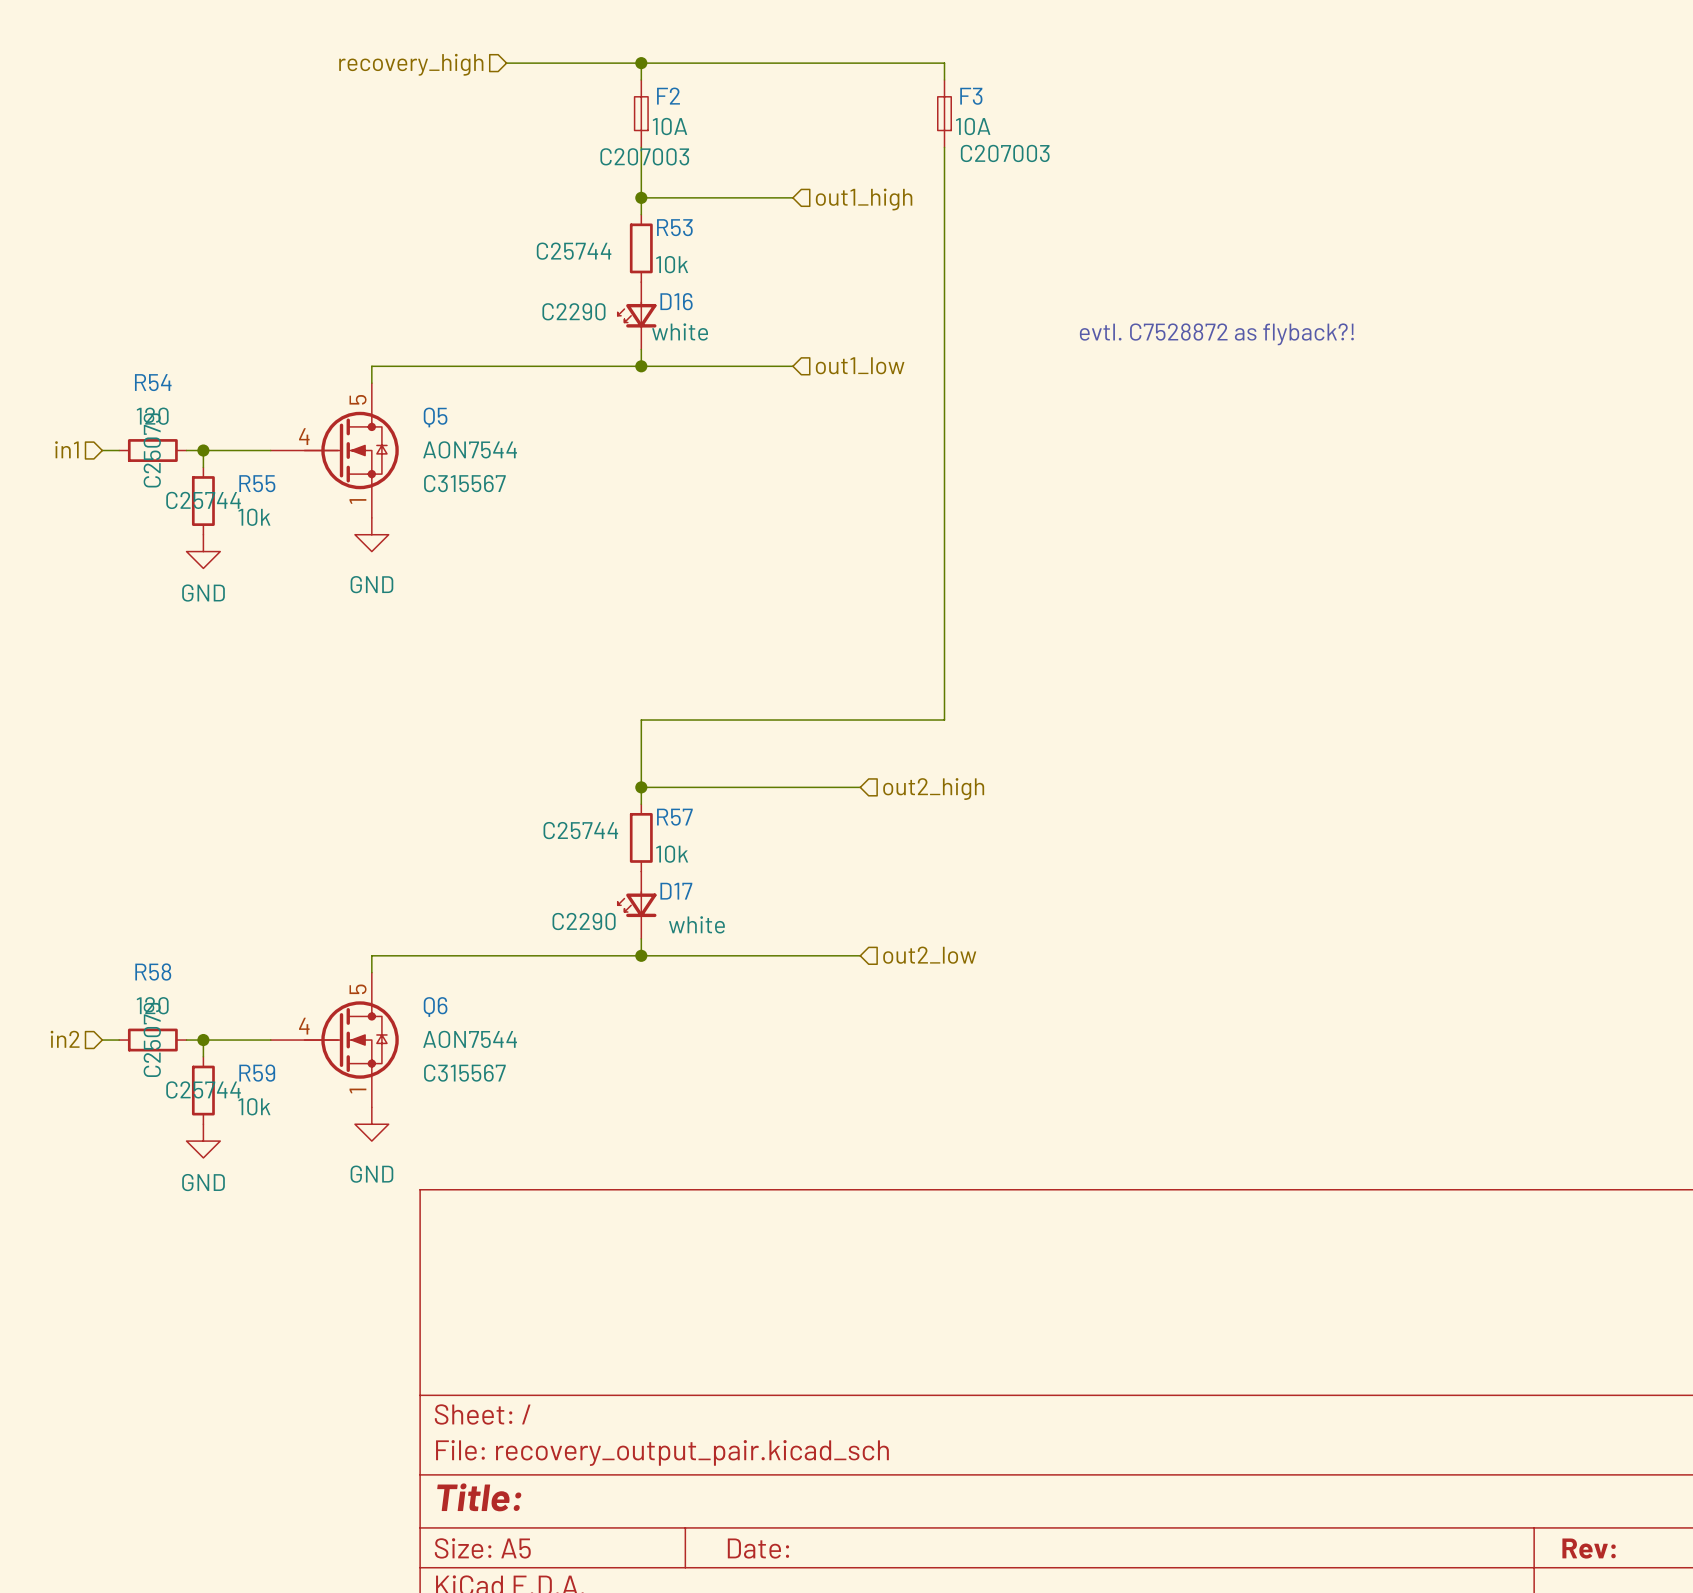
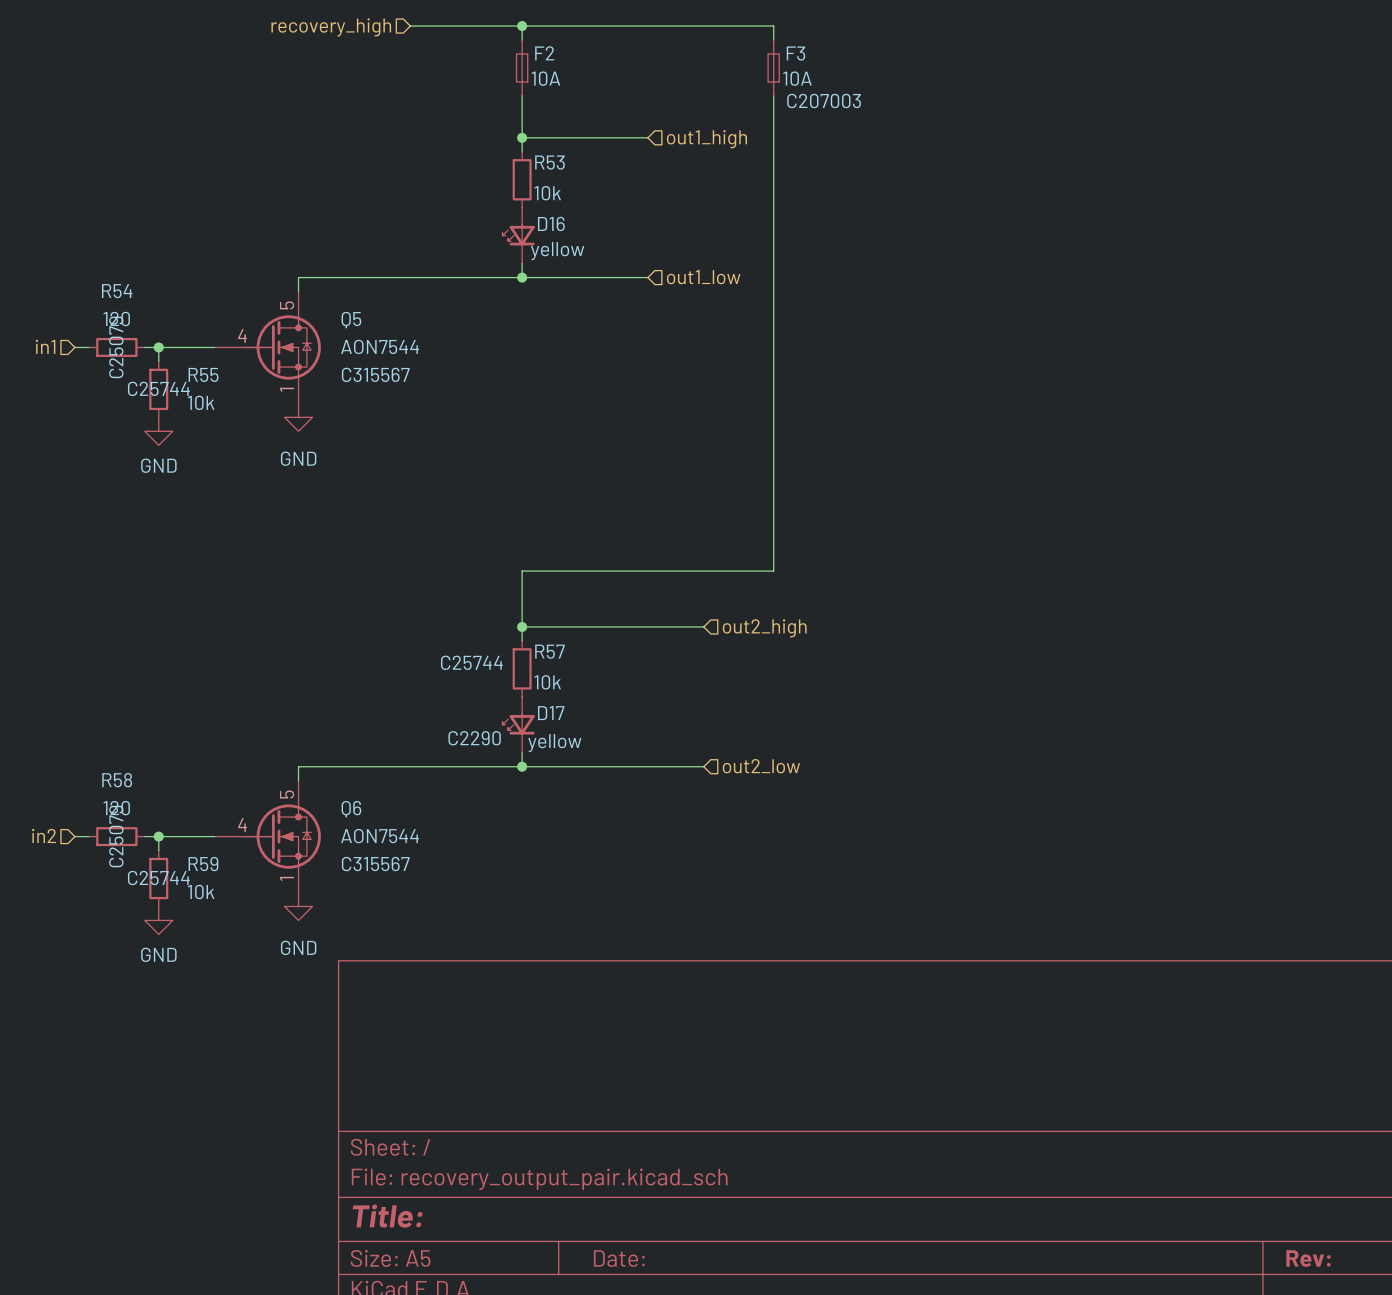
F2 text: C207003 (644, 156) -> none
R53 text: C25744 (574, 251) -> none
D16 text: C2290 (573, 311) -> none
D16 value: white (680, 331) -> yellow (557, 251)
text: evtl. C7528872 as flyback?! (1216, 334) -> none
D17 value: white (696, 924) -> yellow (554, 743)

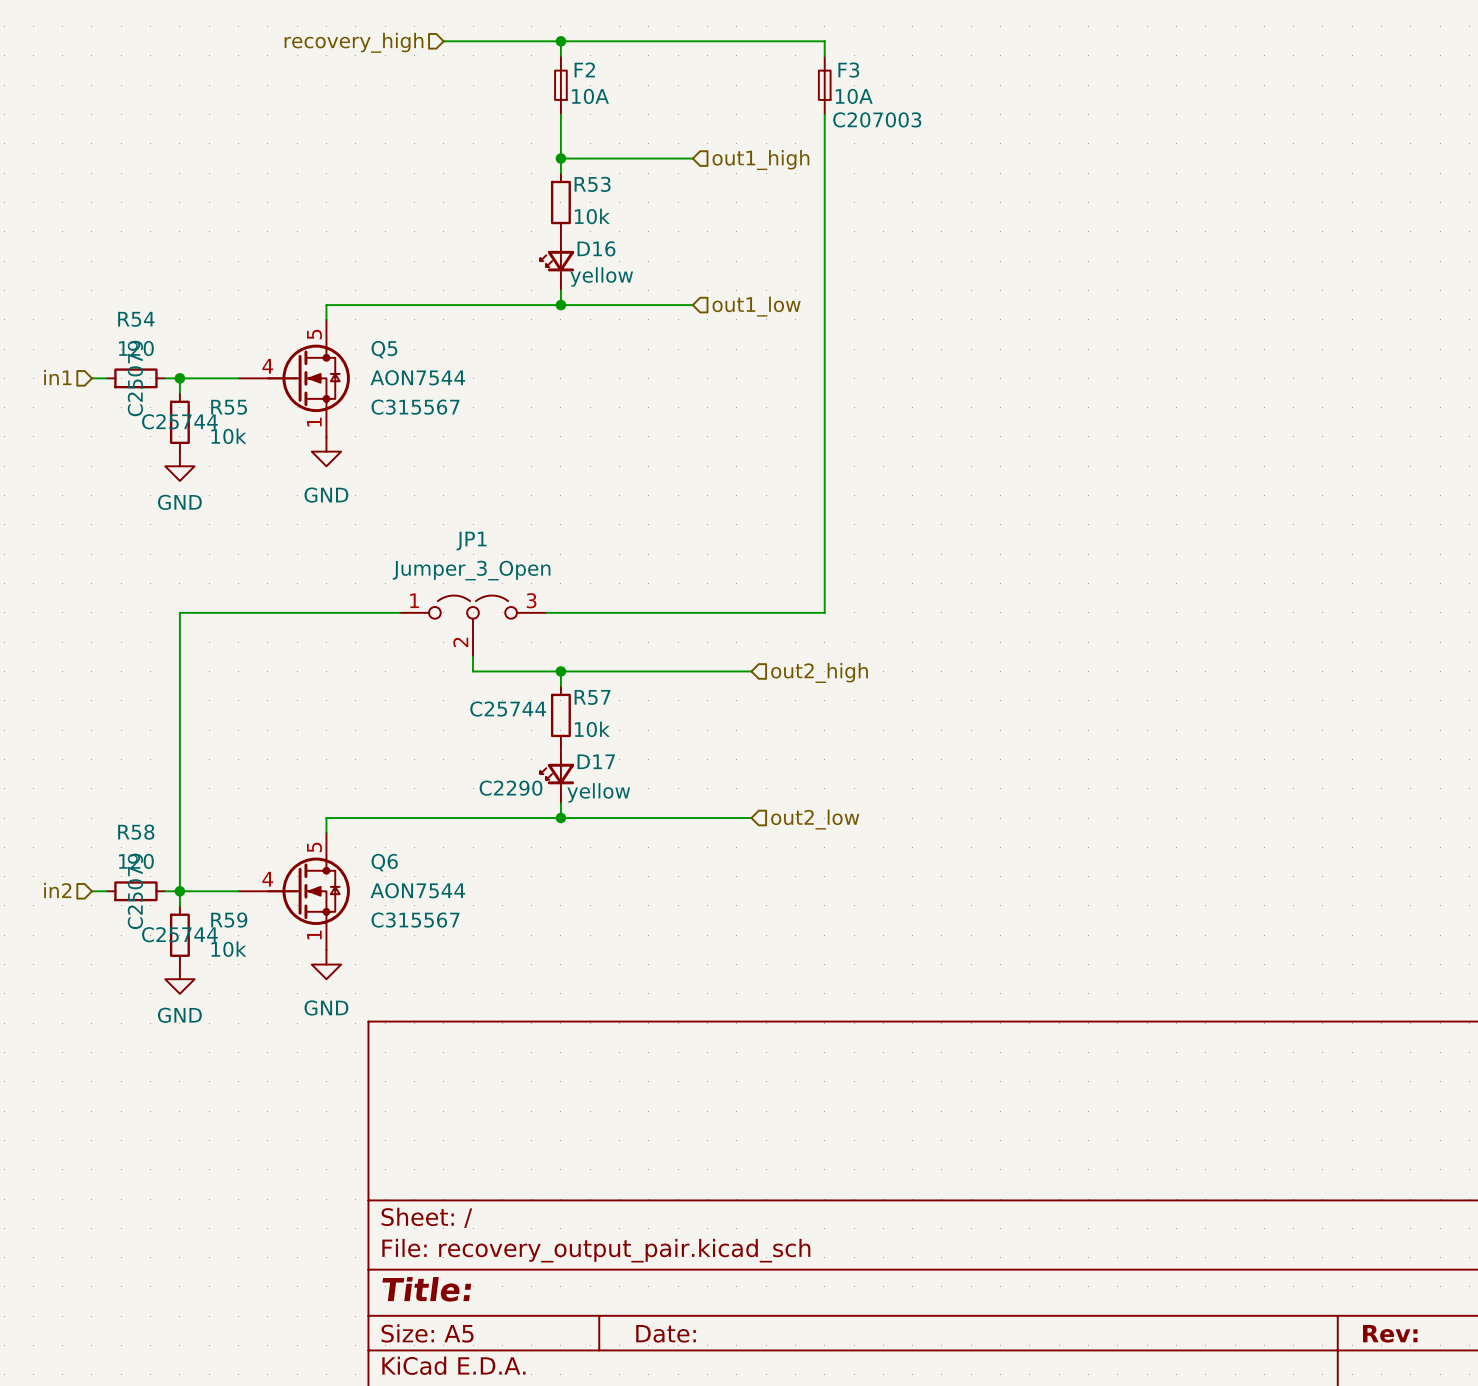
wire: none -> (399, 612) (179, 612) (179, 891)
wire: (522, 571) (522, 626) -> (560, 612) (546, 612)
JP1: none -> Jumper_3_Open (473, 626)
wire: none -> (473, 656) (473, 671) (560, 671)

